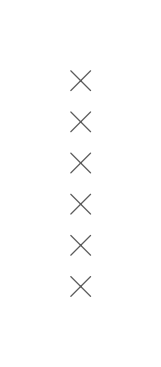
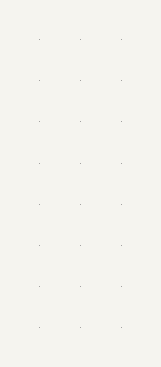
no-connect mark: (80, 80) -> none
no-connect mark: (80, 121) -> none
no-connect mark: (80, 163) -> none
no-connect mark: (80, 204) -> none
no-connect mark: (80, 245) -> none
no-connect mark: (80, 286) -> none

